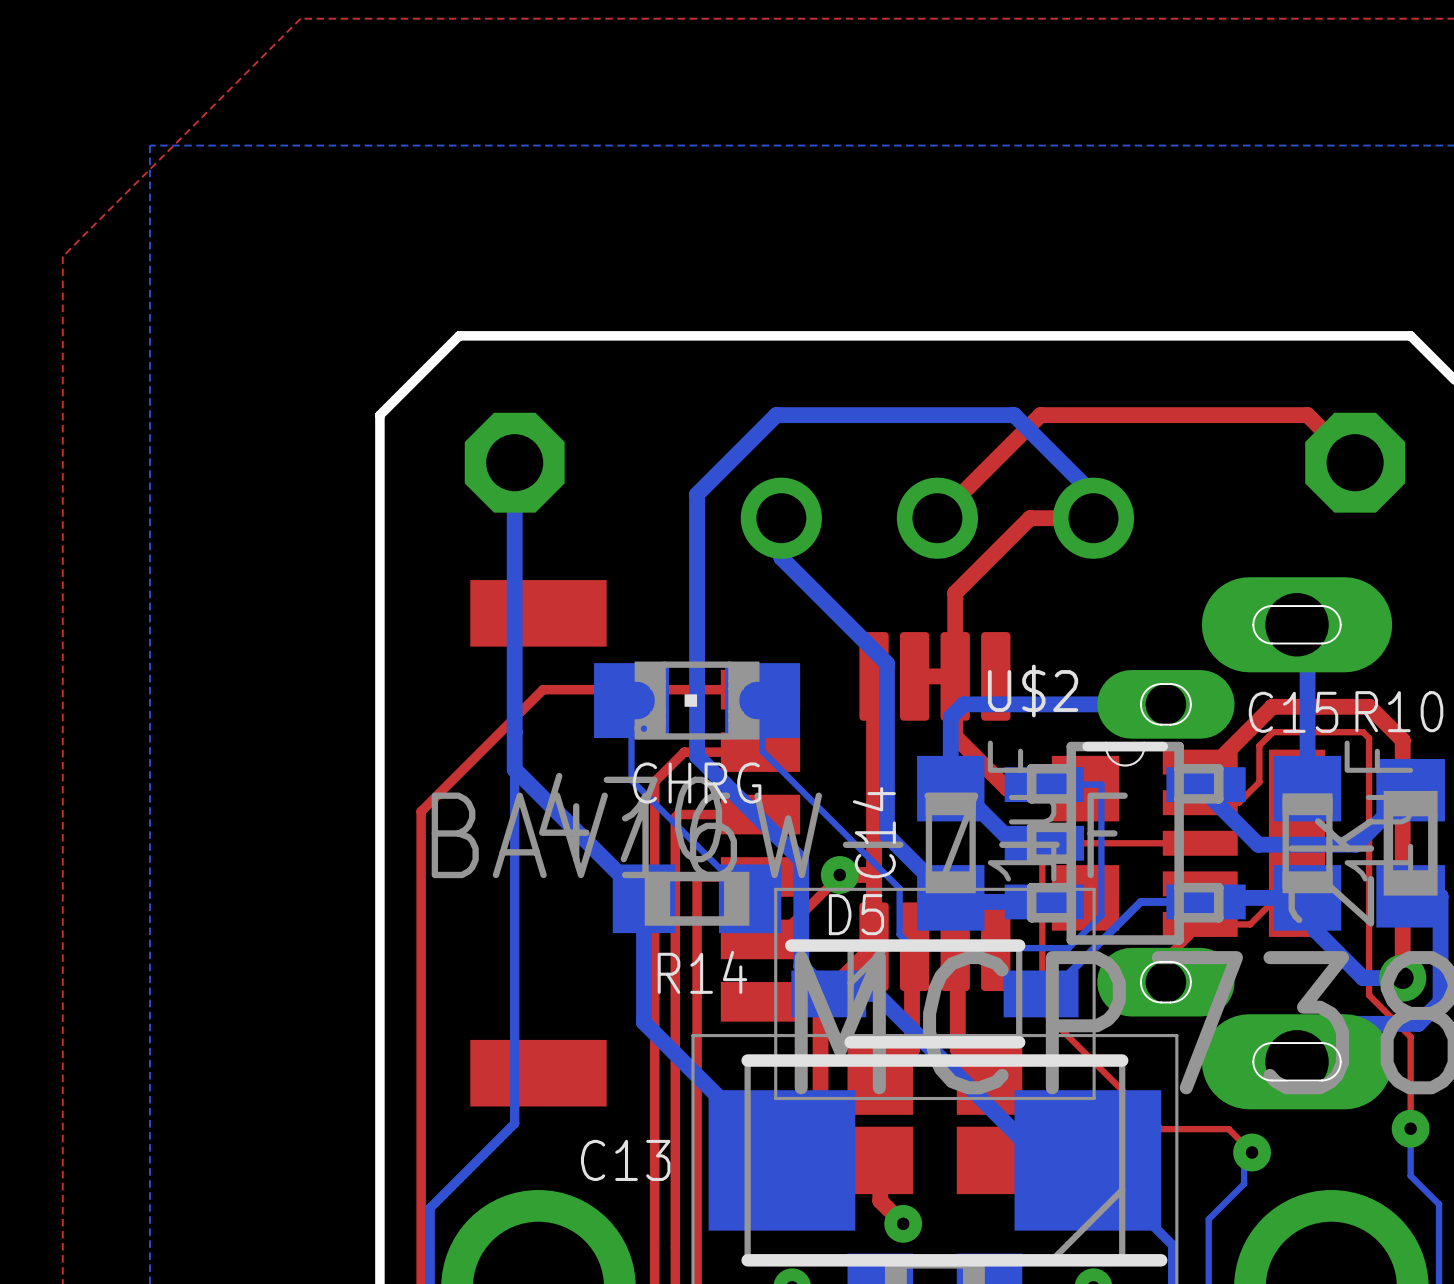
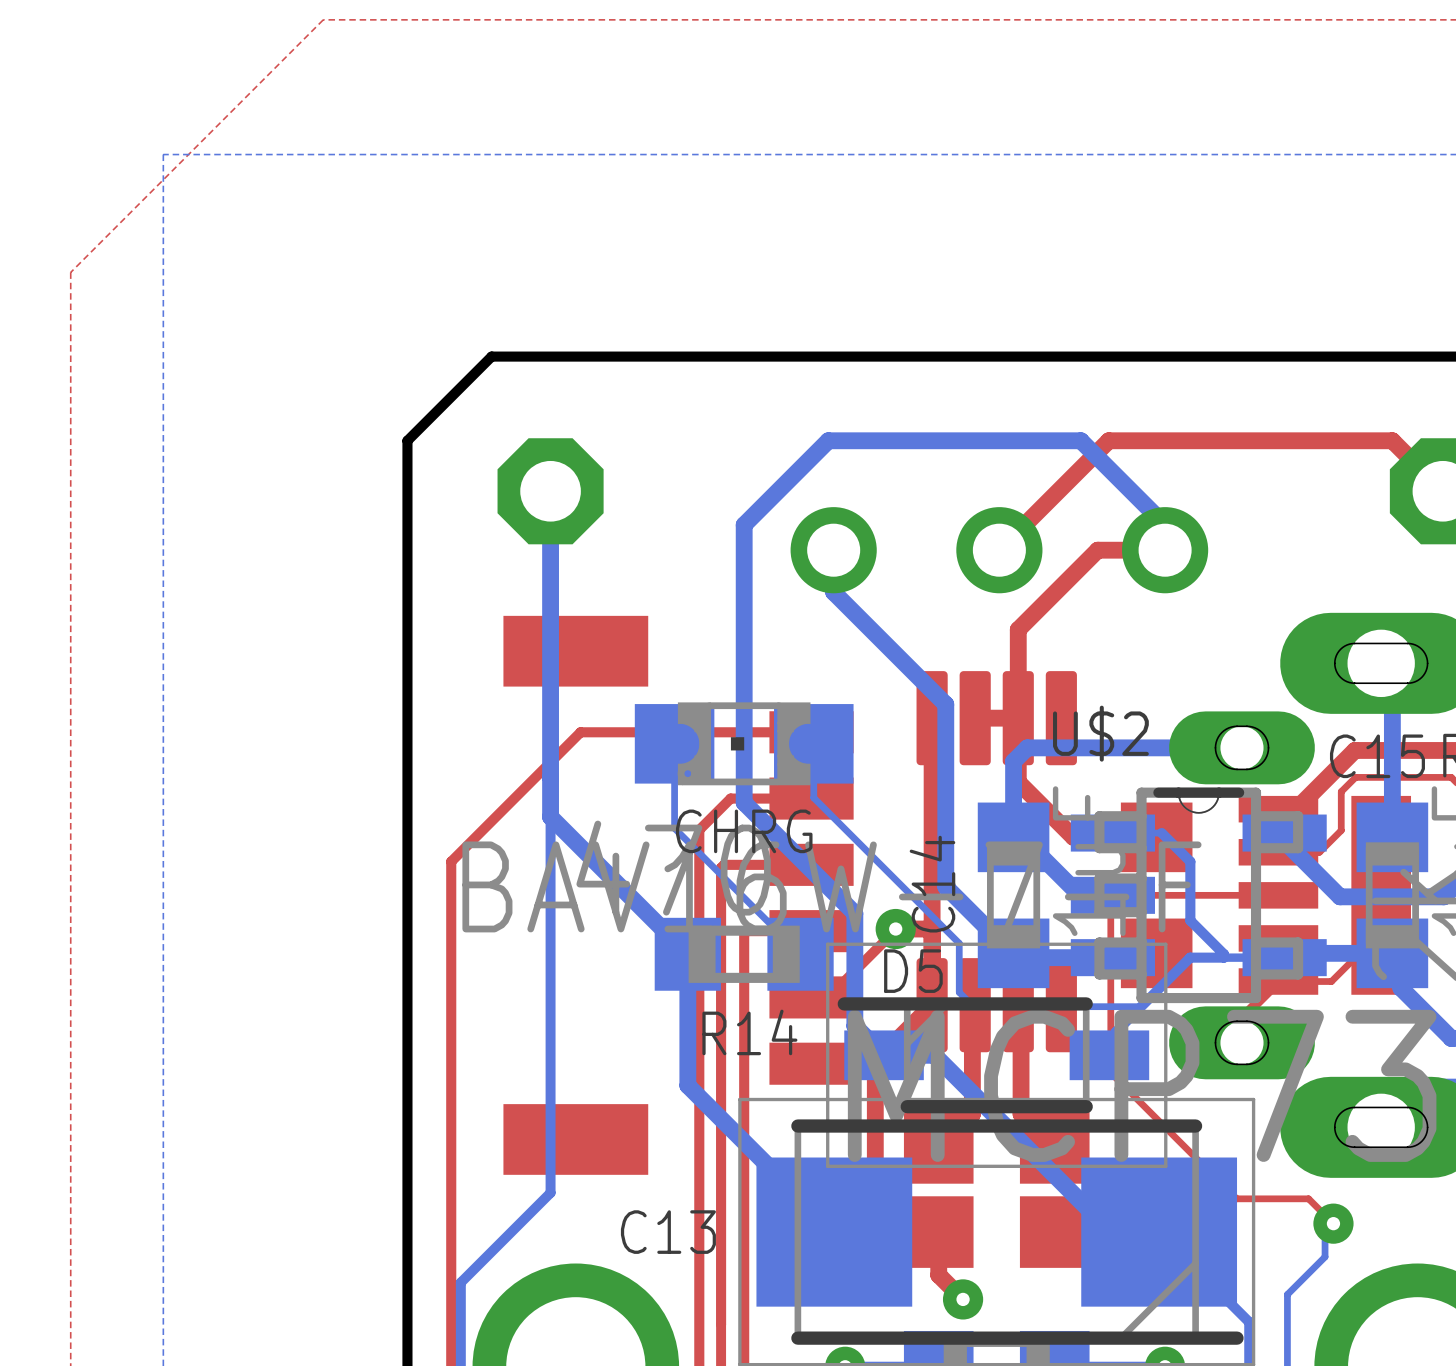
bottom track: (1090, 784) (1101, 784) (1101, 915) (1068, 948) -> (1161, 833) (1190, 861) (1190, 920) (1224, 954) (1224, 957) (1190, 957) (1115, 1031) (1115, 1055)
bottom track: (1140, 901) (1047, 993) -> none

